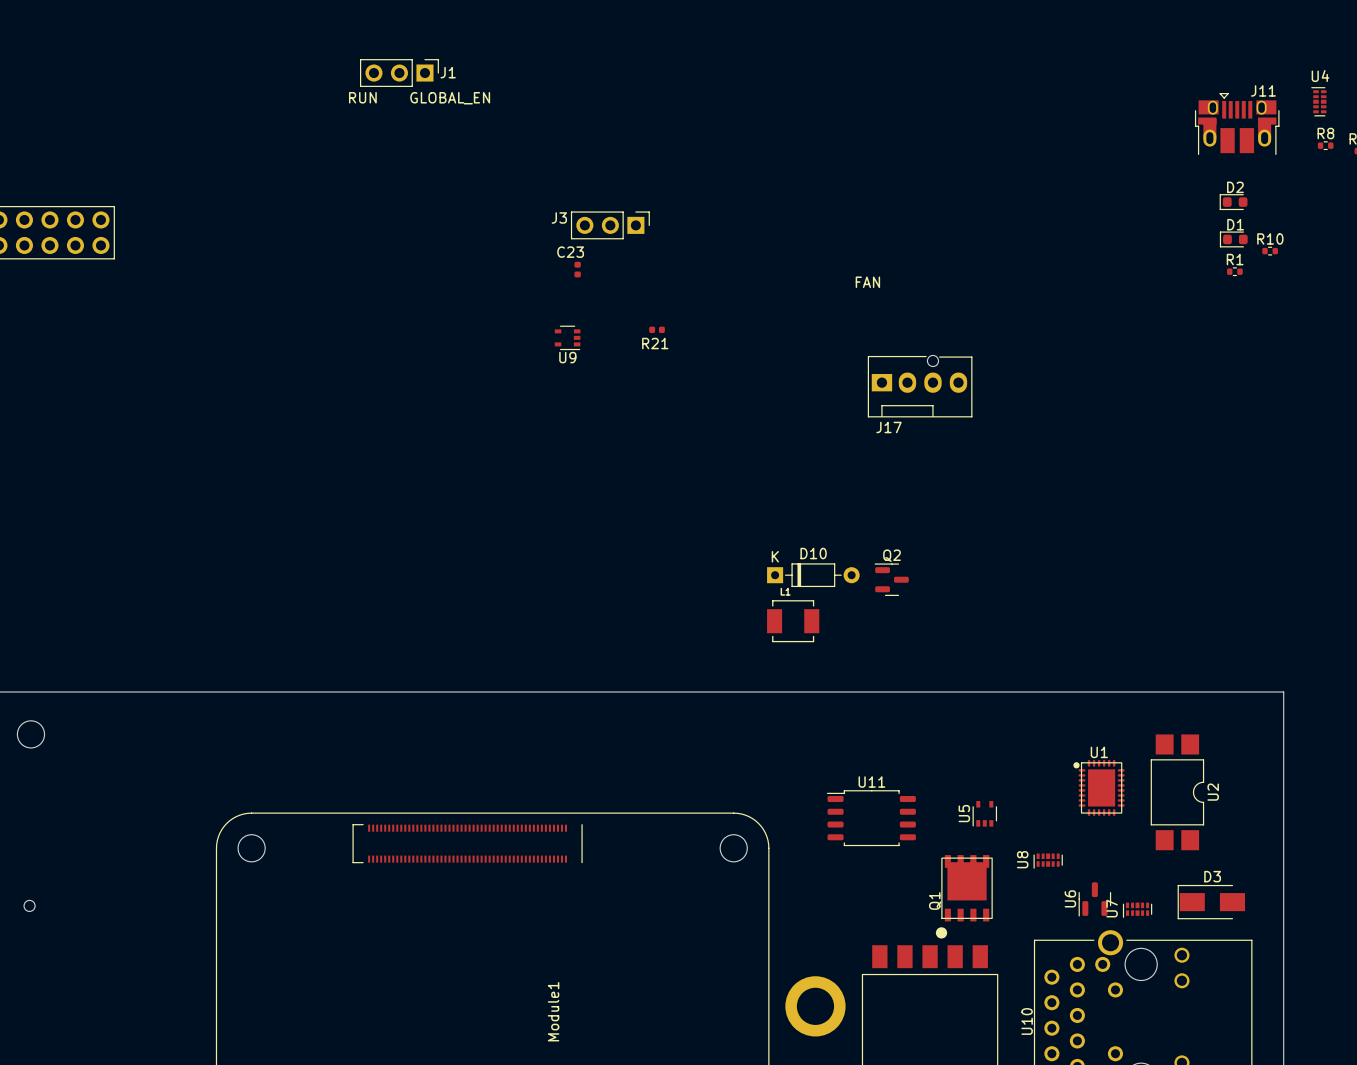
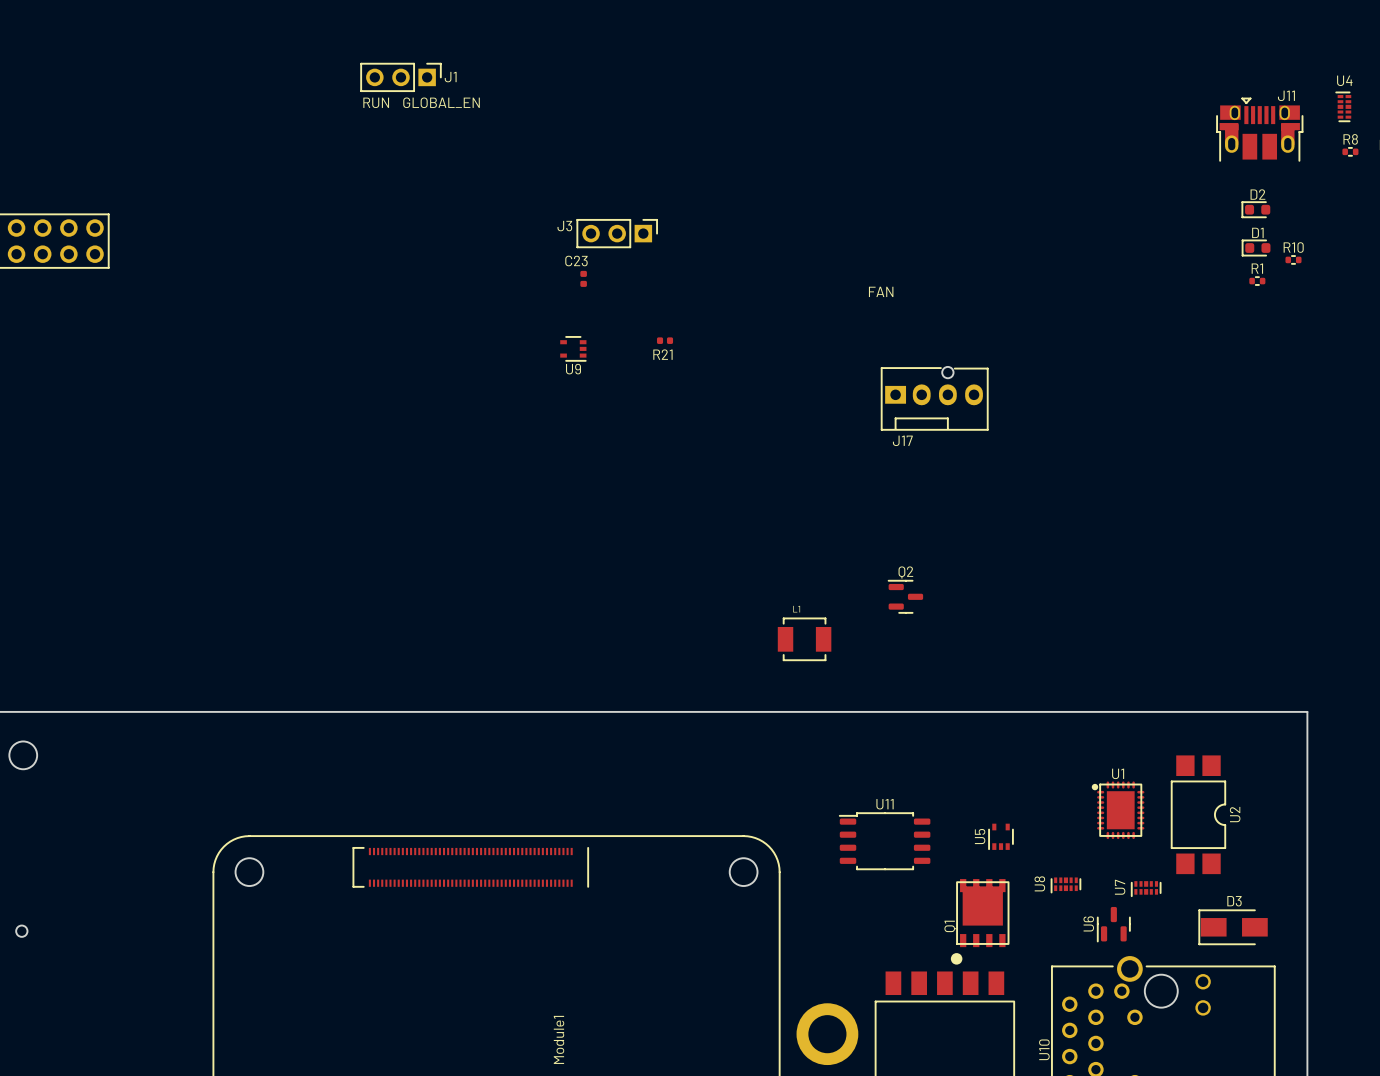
D10: (813, 575) -> none
U7 position: (1137, 910) -> (1146, 888)

